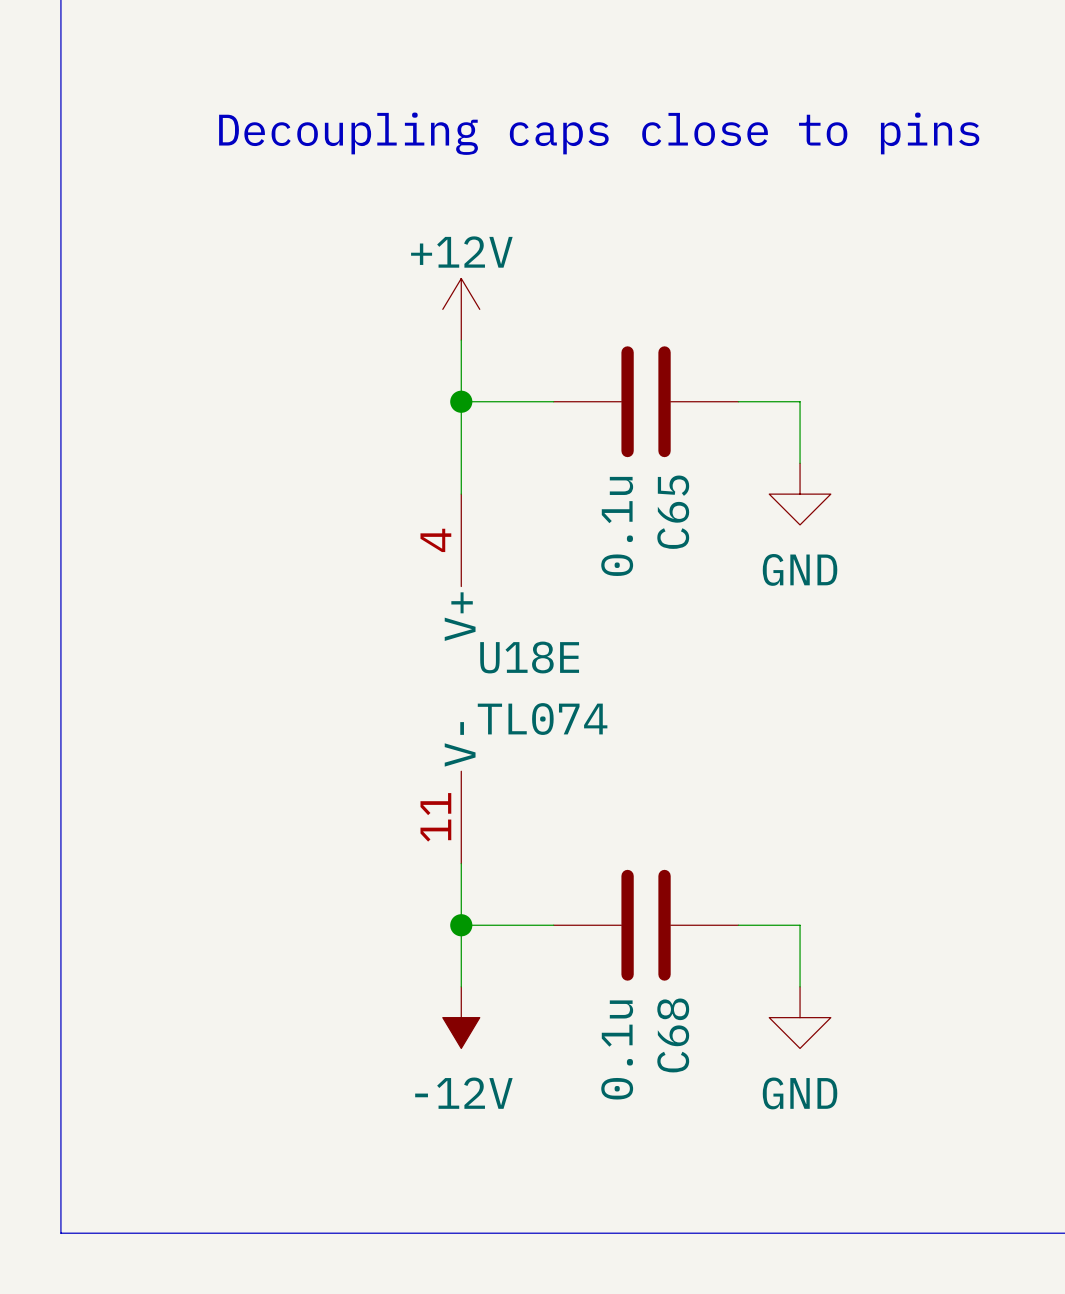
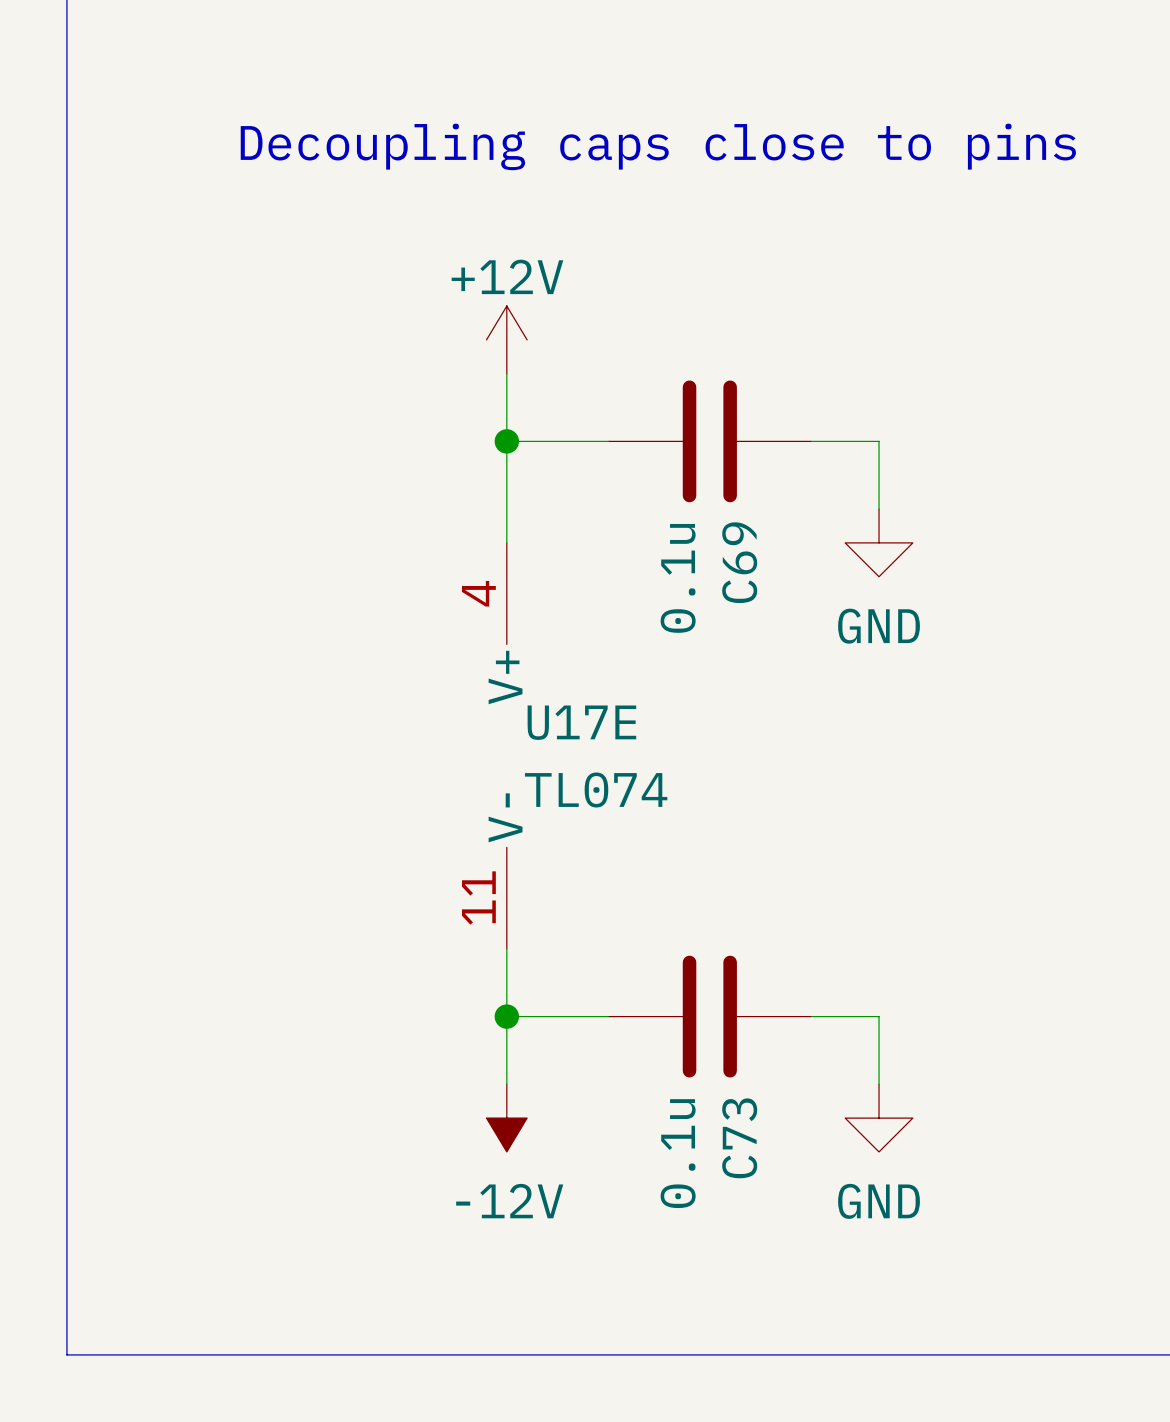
C65 name: C65 (673, 512) -> C69 (739, 562)
U18E name: U18E (529, 657) -> U17E (581, 722)
C68 name: C68 (673, 1035) -> C73 (739, 1138)

